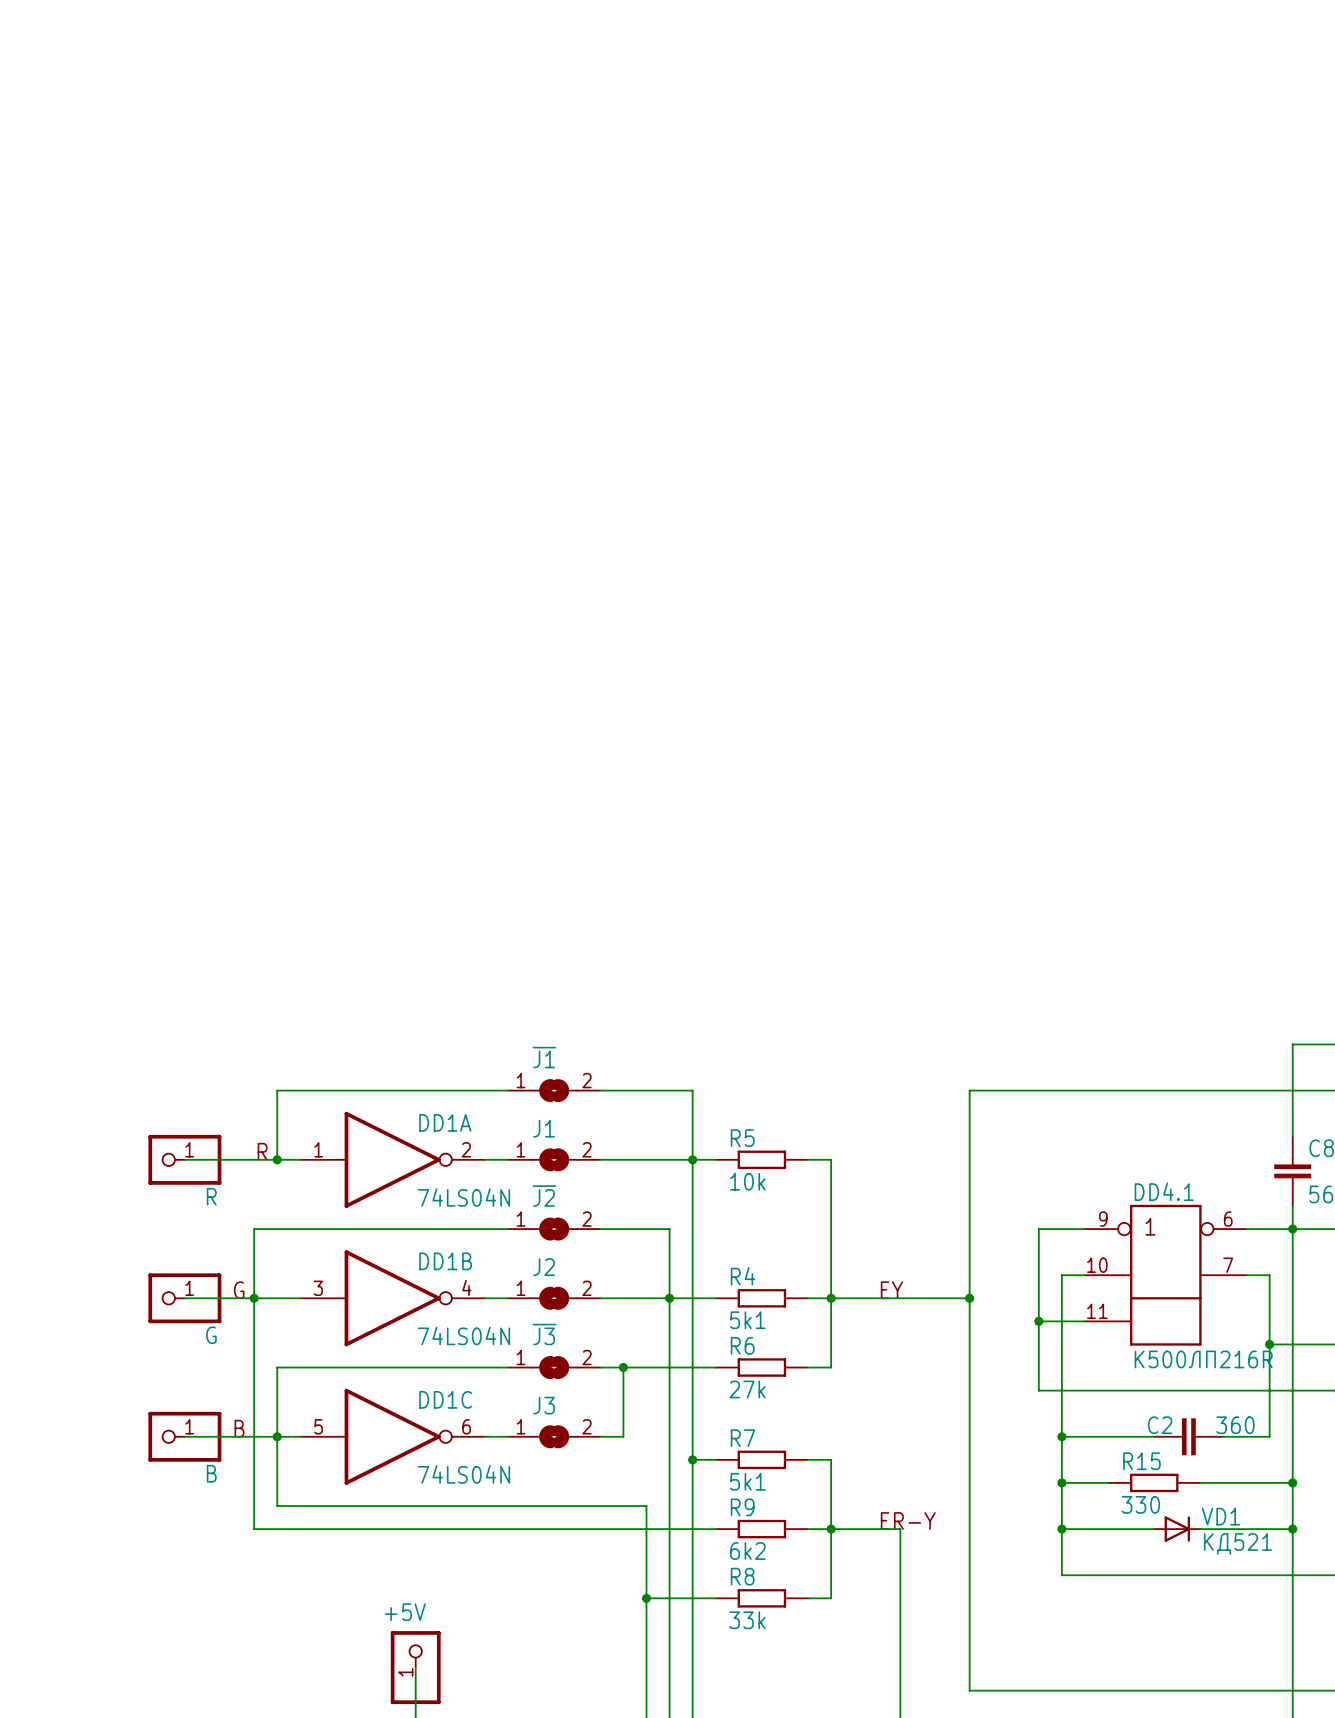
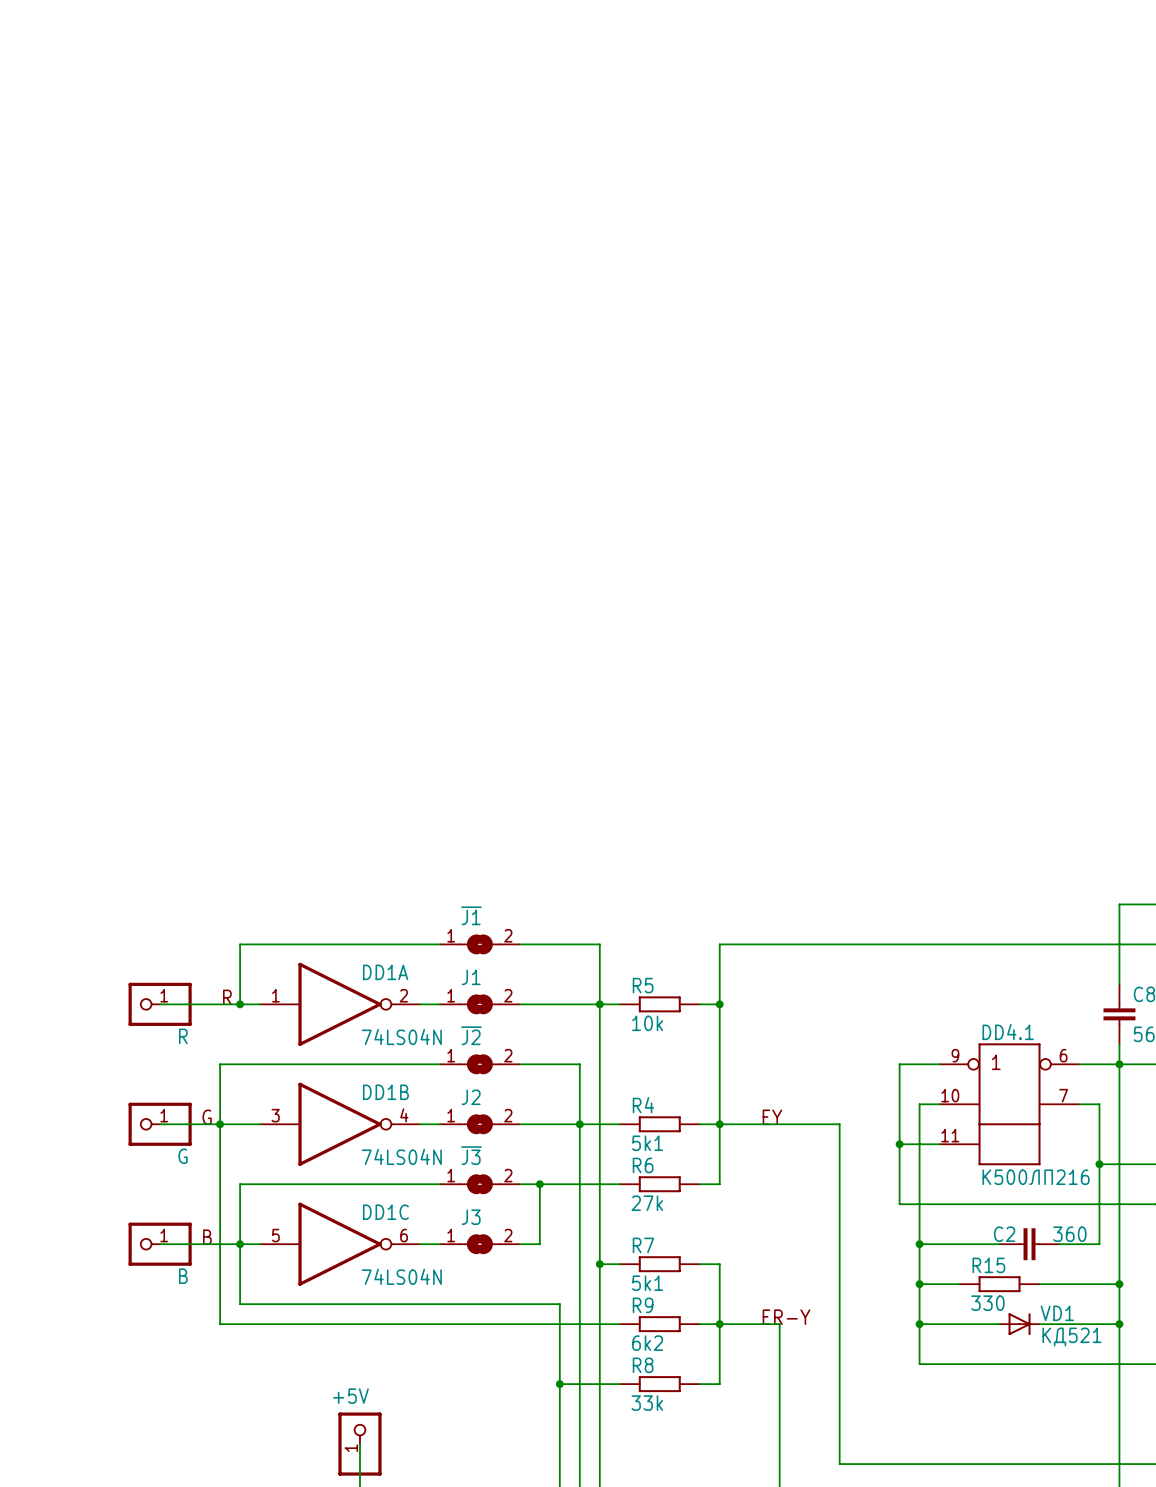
wire: (969, 1090) (969, 1298) -> (839, 944) (719, 944) (719, 1004)
junction: none -> (719, 1004)
junction: (969, 1298) -> none
DD4.1 value: К500ЛП216R (1203, 1359) -> К500ЛП216 (1036, 1177)

